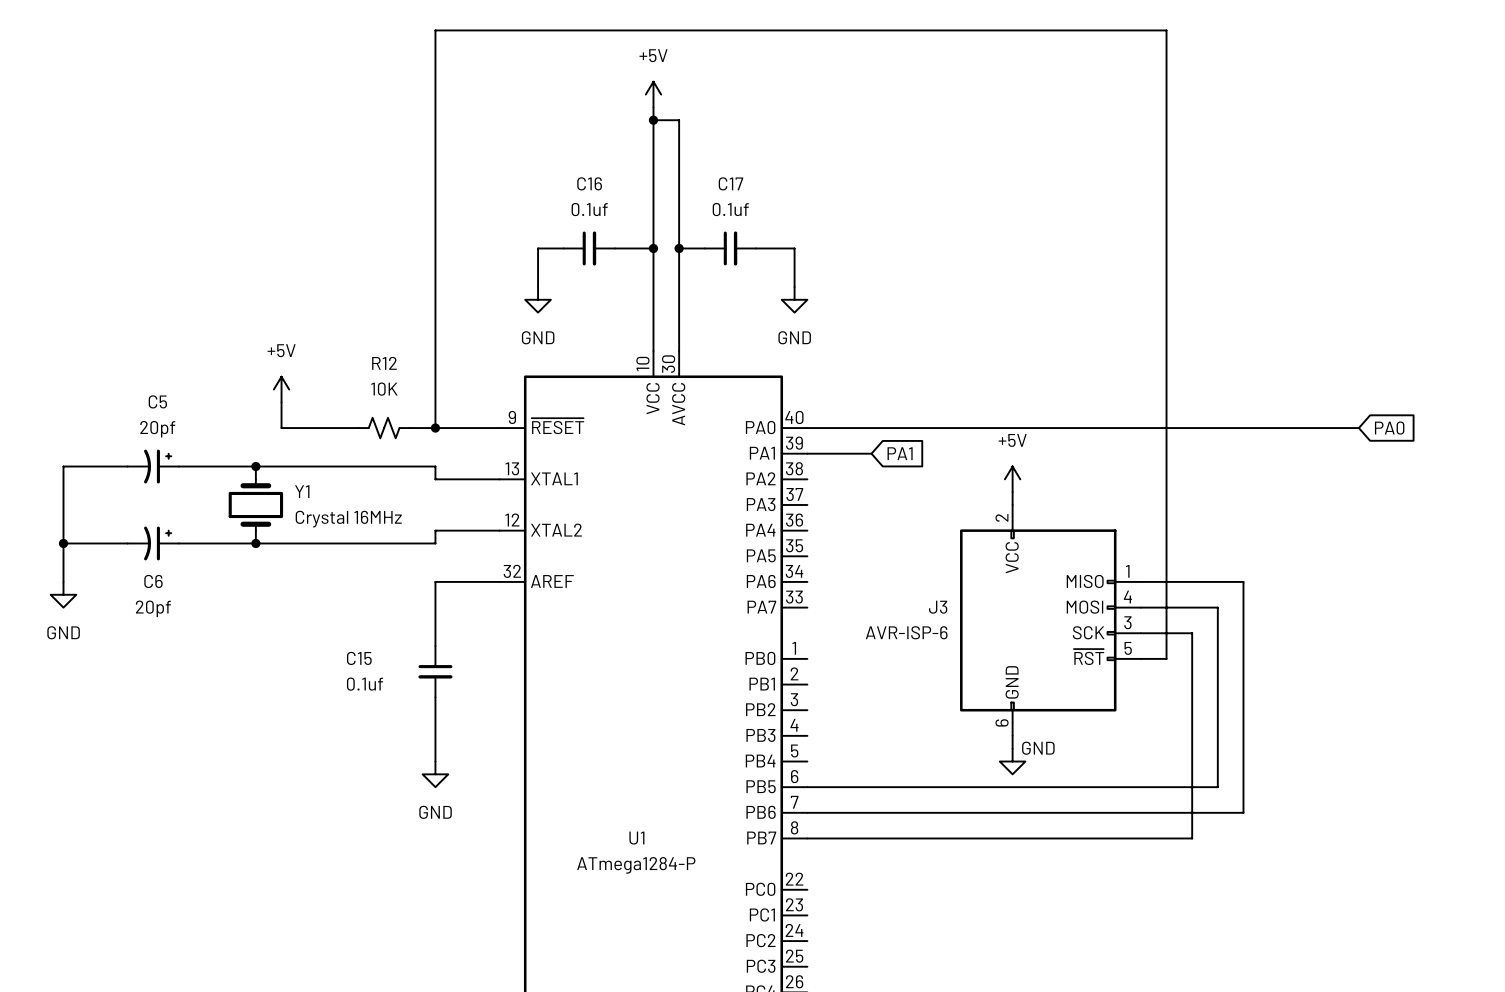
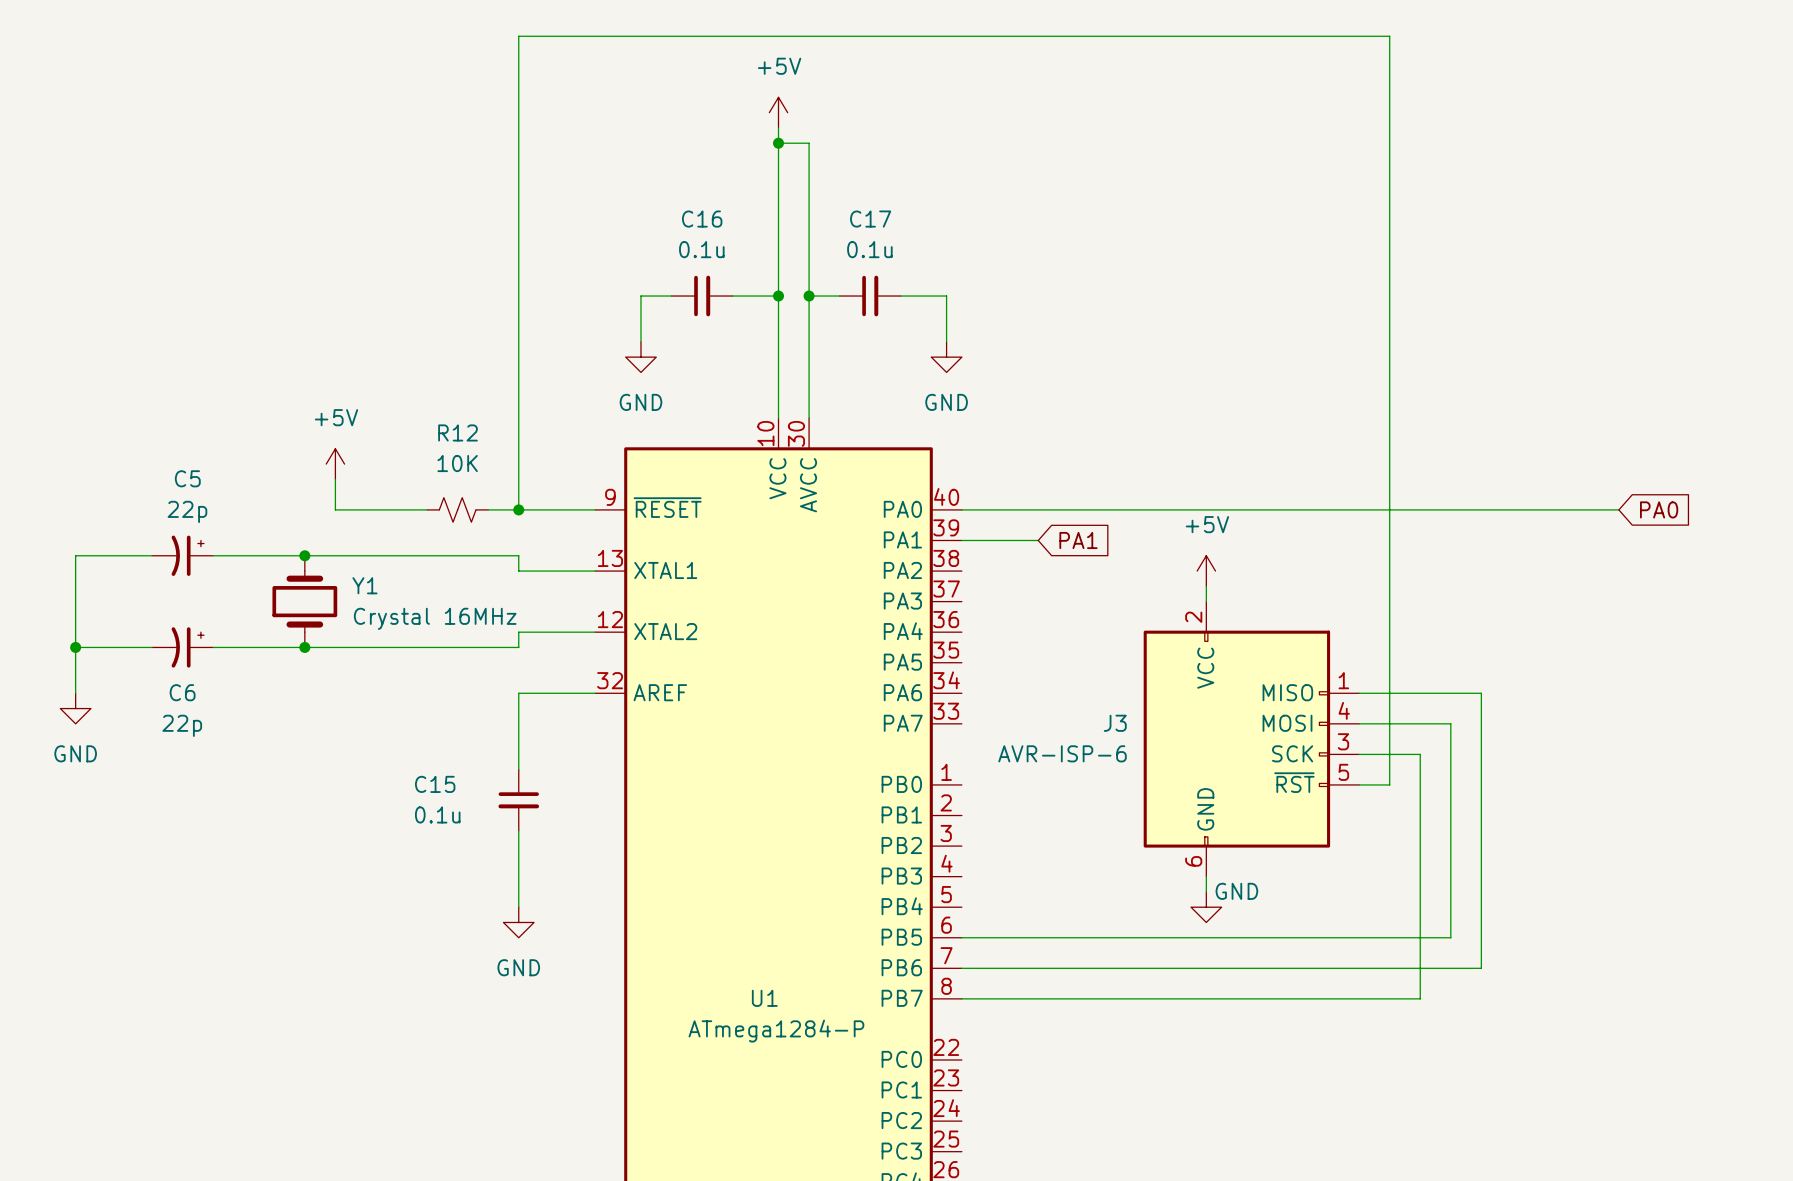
C16 value: 0.1uf (589, 209) -> 0.1u (701, 249)
C17 value: 0.1uf (730, 209) -> 0.1u (869, 249)
C5 value: 20pf (157, 429) -> 22p (187, 511)
C6 value: 20pf (153, 608) -> 22p (182, 725)
C15 value: 0.1uf (365, 684) -> 0.1u (437, 814)

